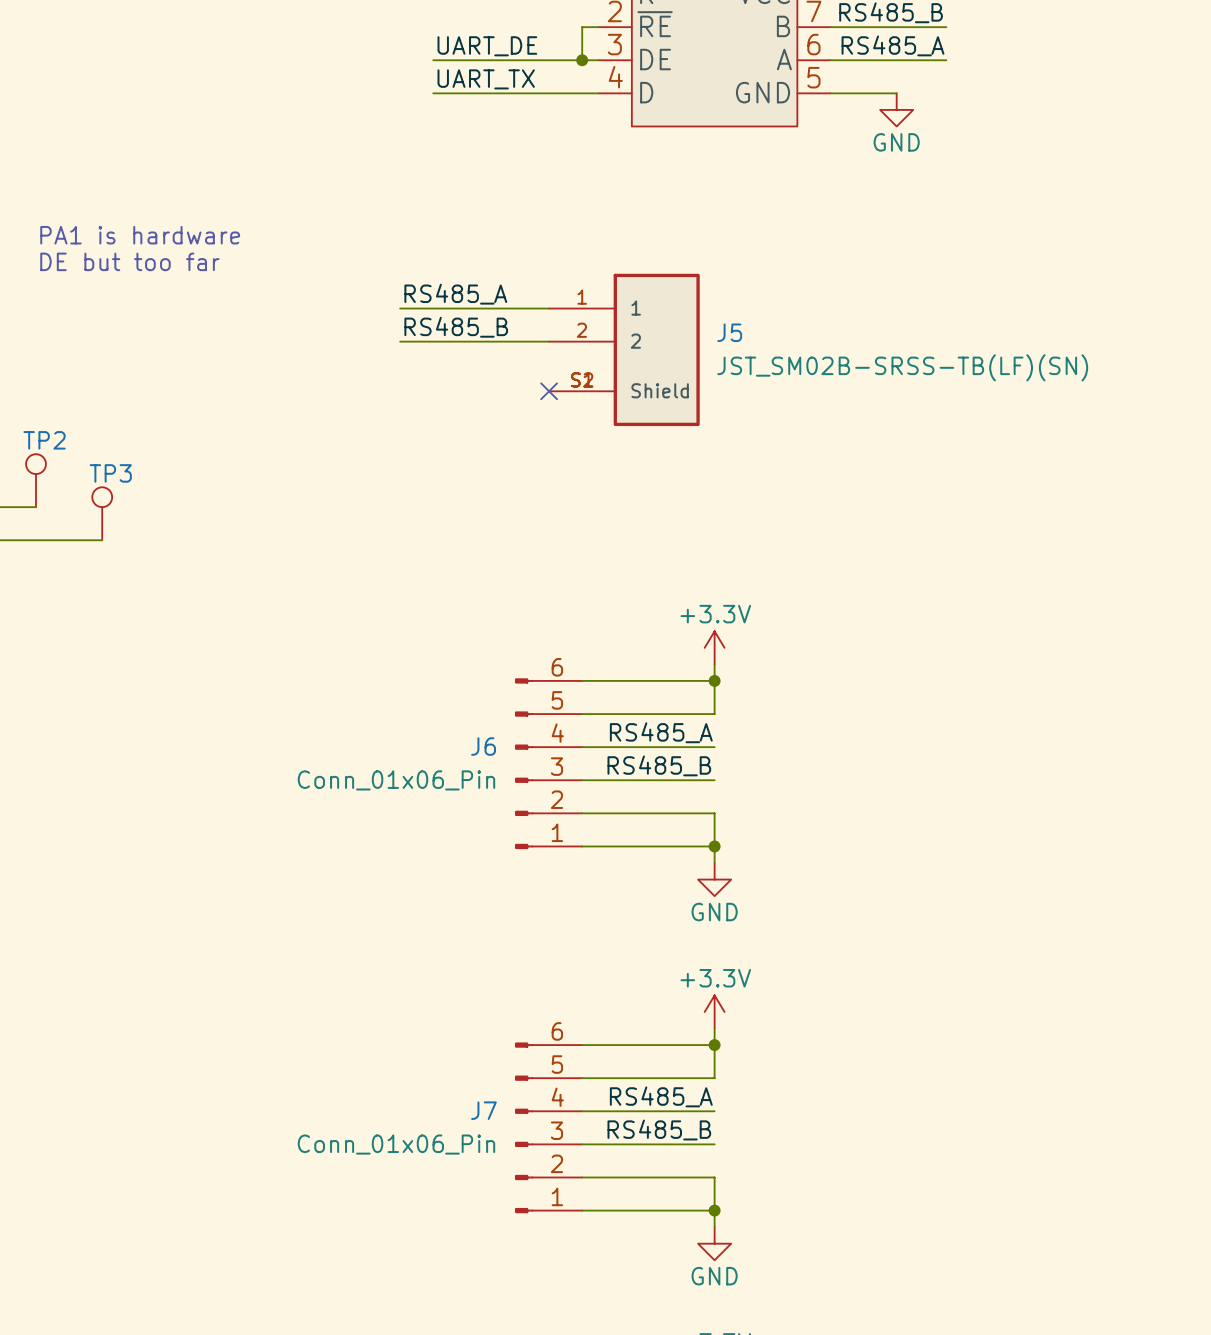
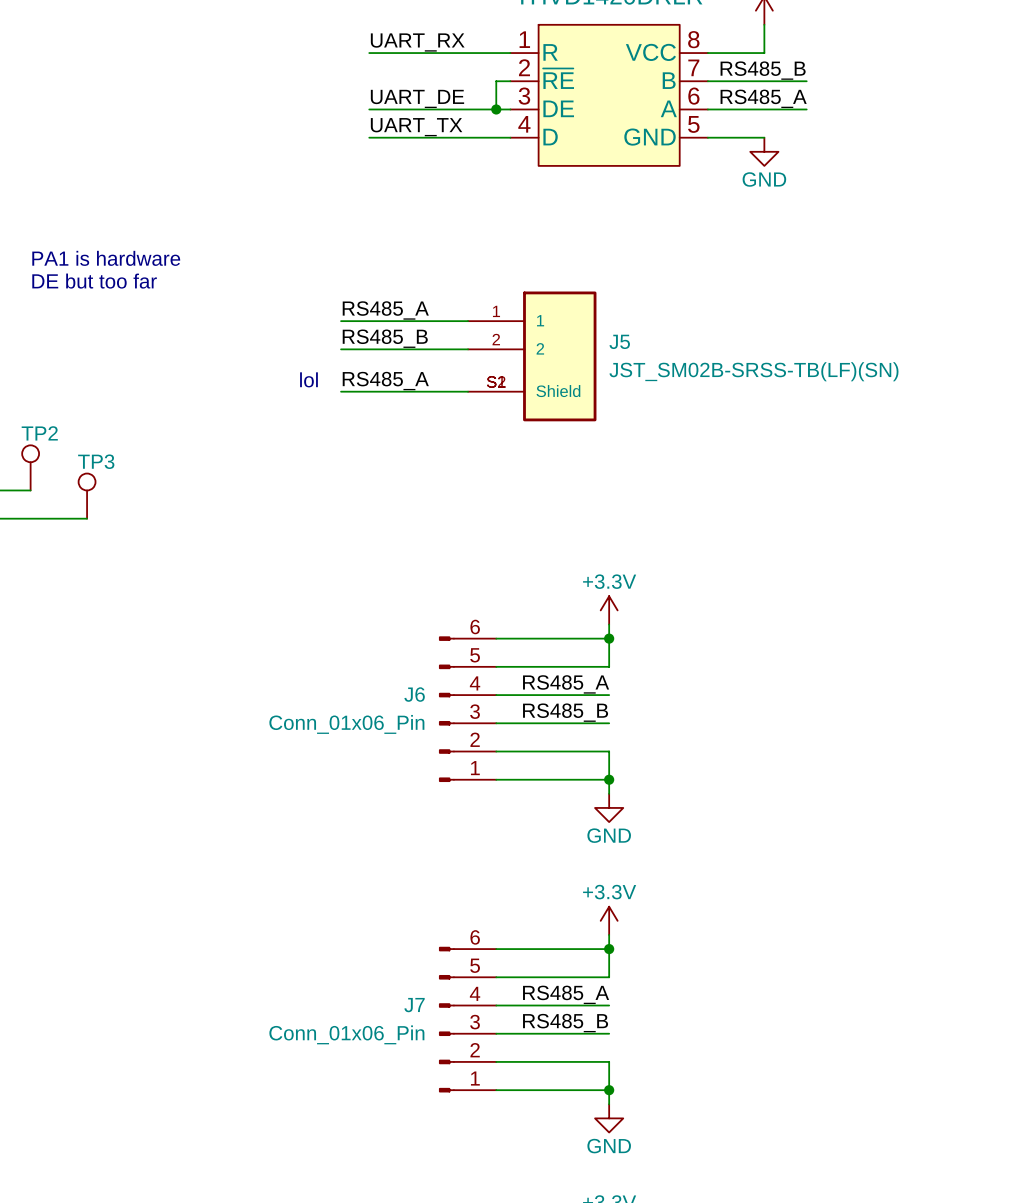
label: none -> RS485_A (385, 381)
text: none -> lol (308, 379)
wire: none -> (341, 391) (468, 391)
no-connect mark: (549, 391) -> none

